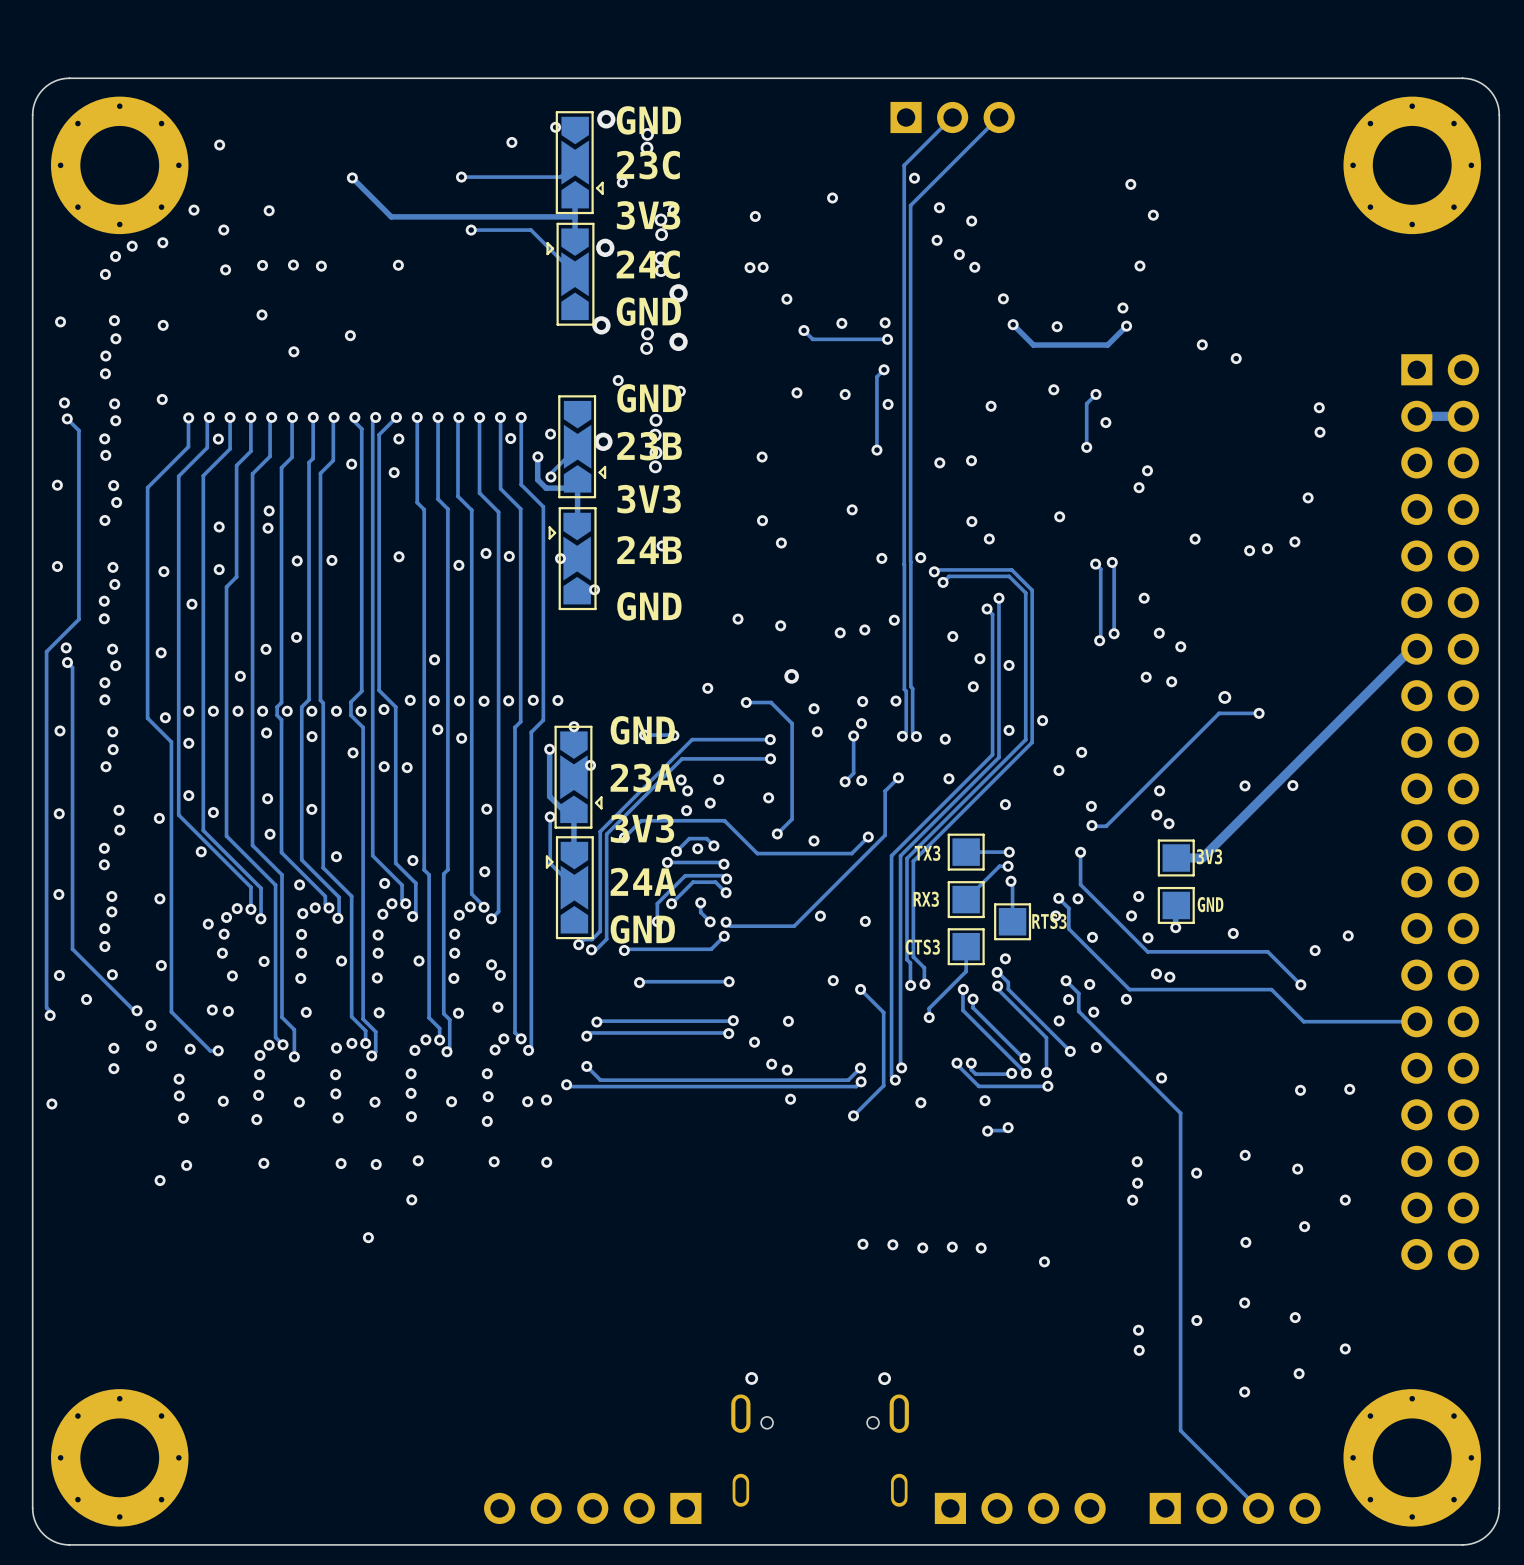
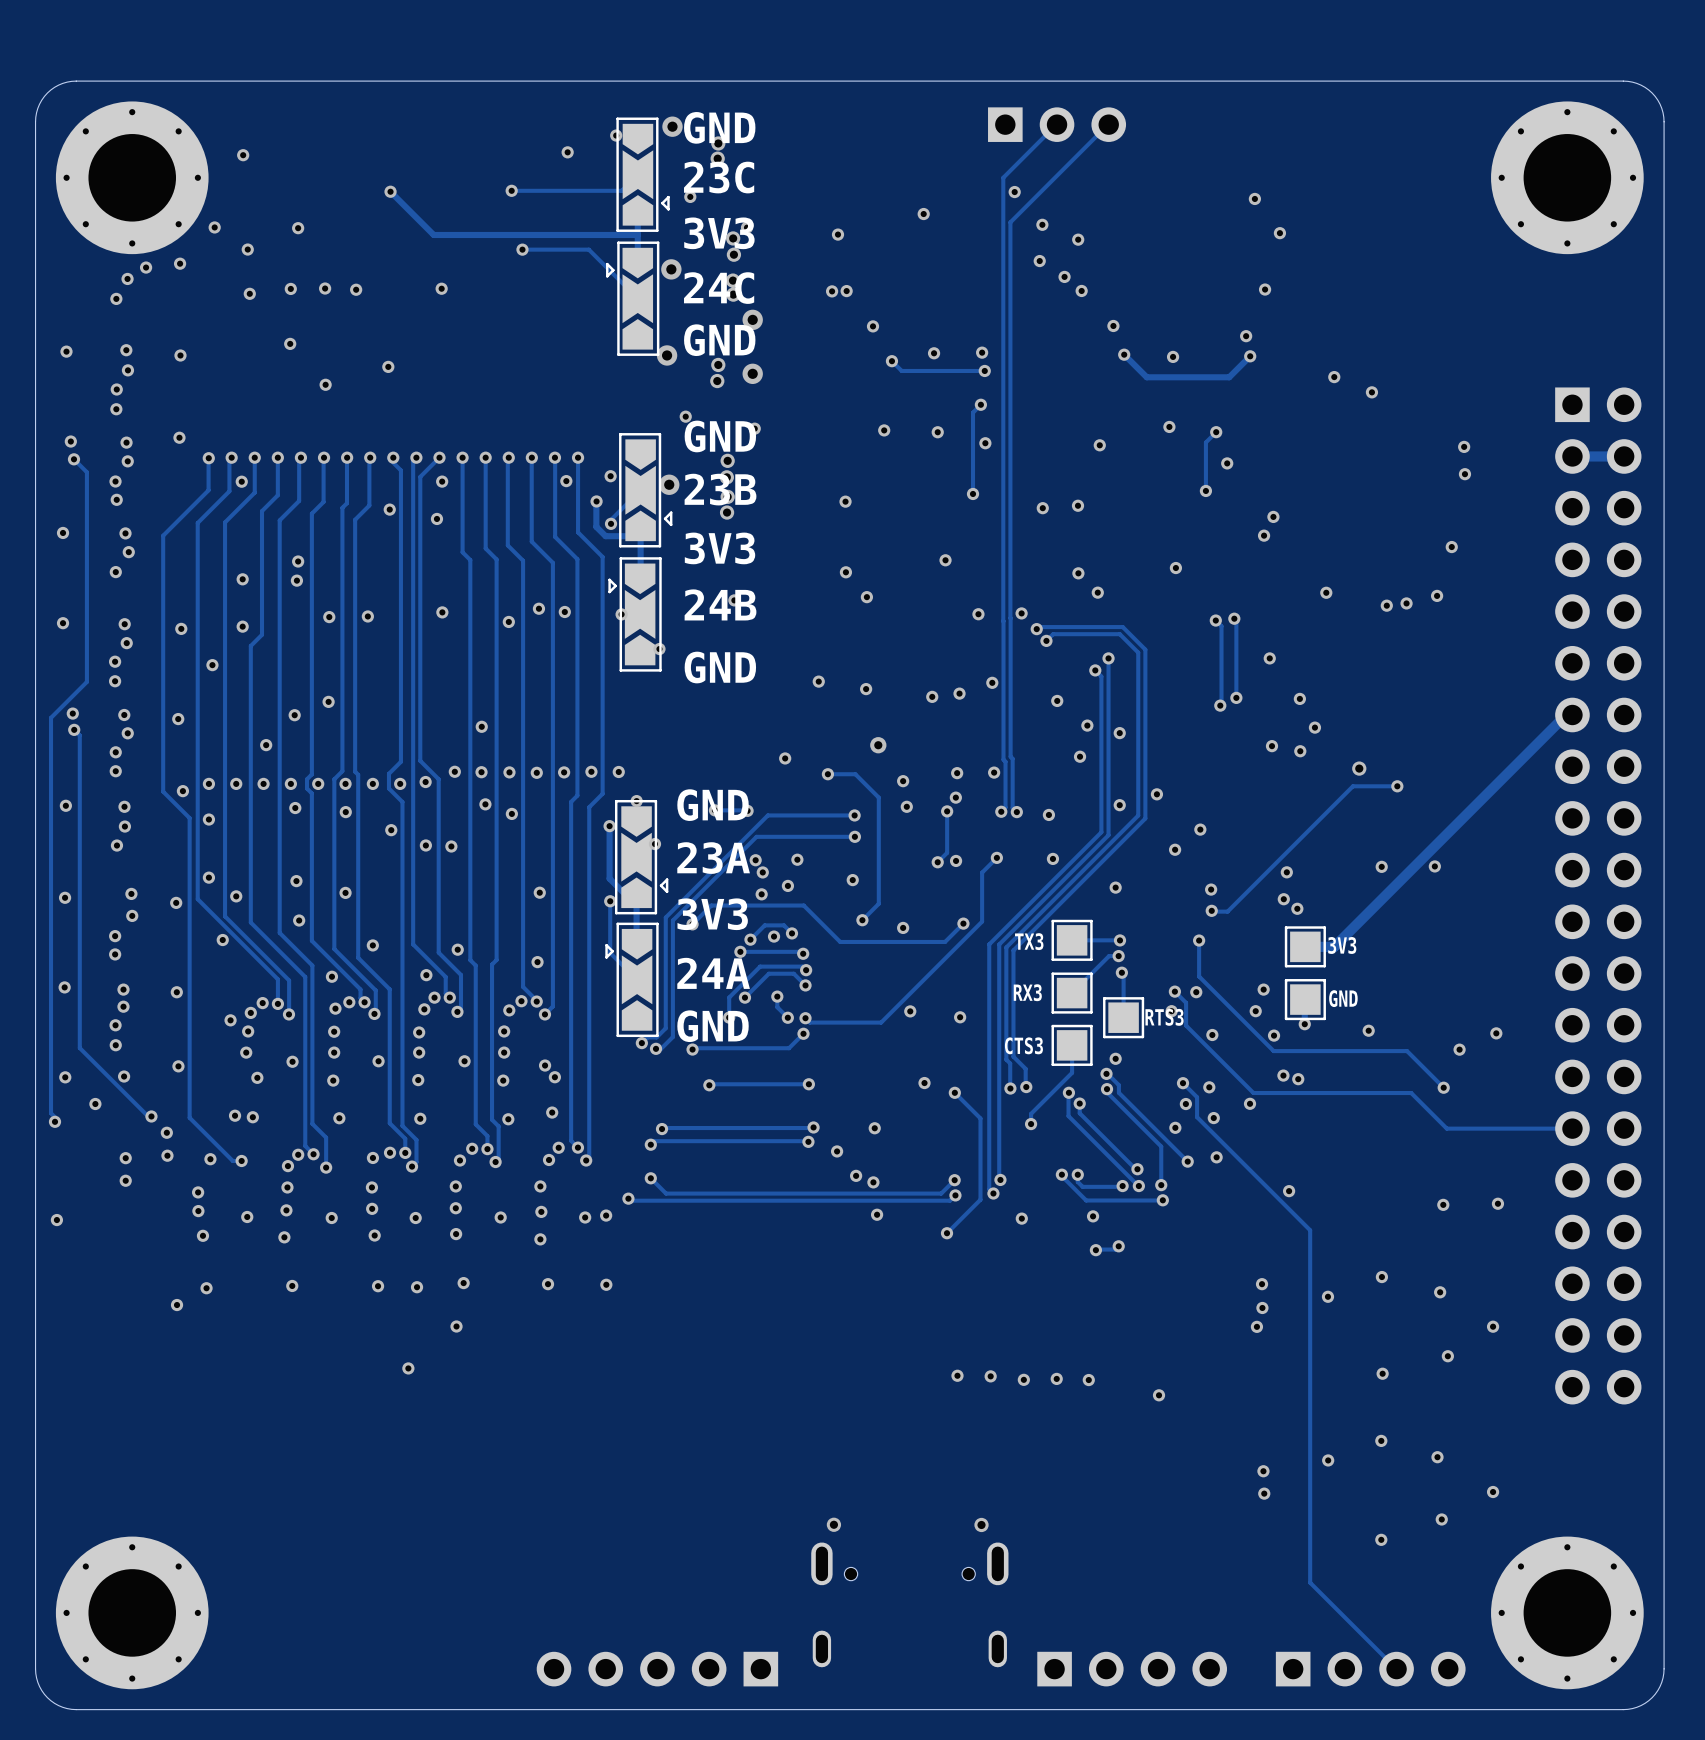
via: (1159, 633) -> none
via: none -> (1299, 698)
via: (1180, 646) -> none
via: none -> (1314, 727)

